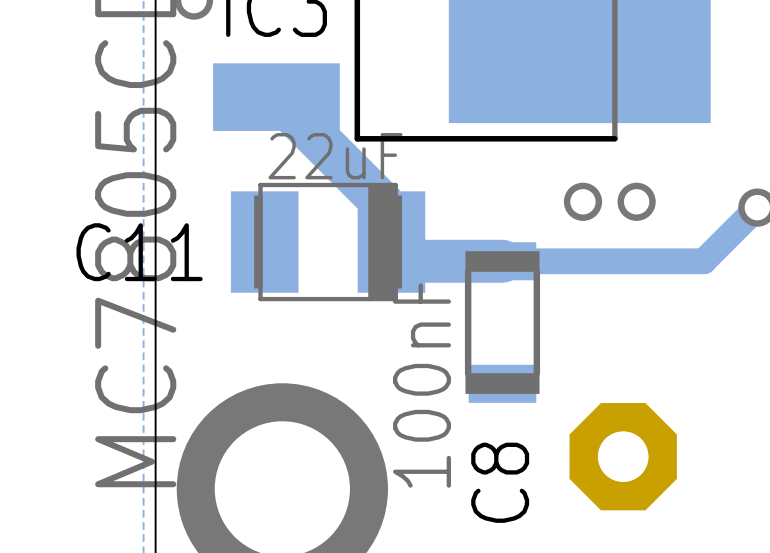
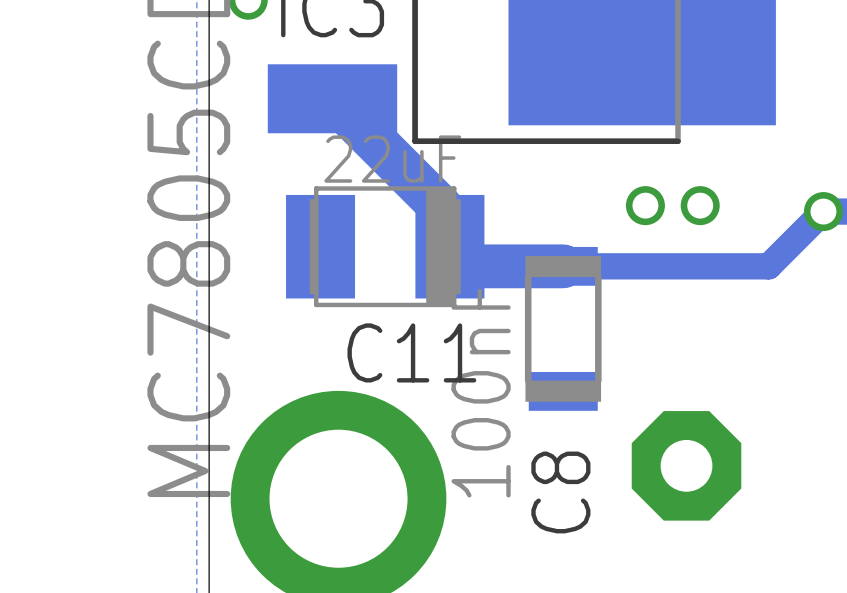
C11 name position: C11 (139, 252) -> C11 (411, 352)

